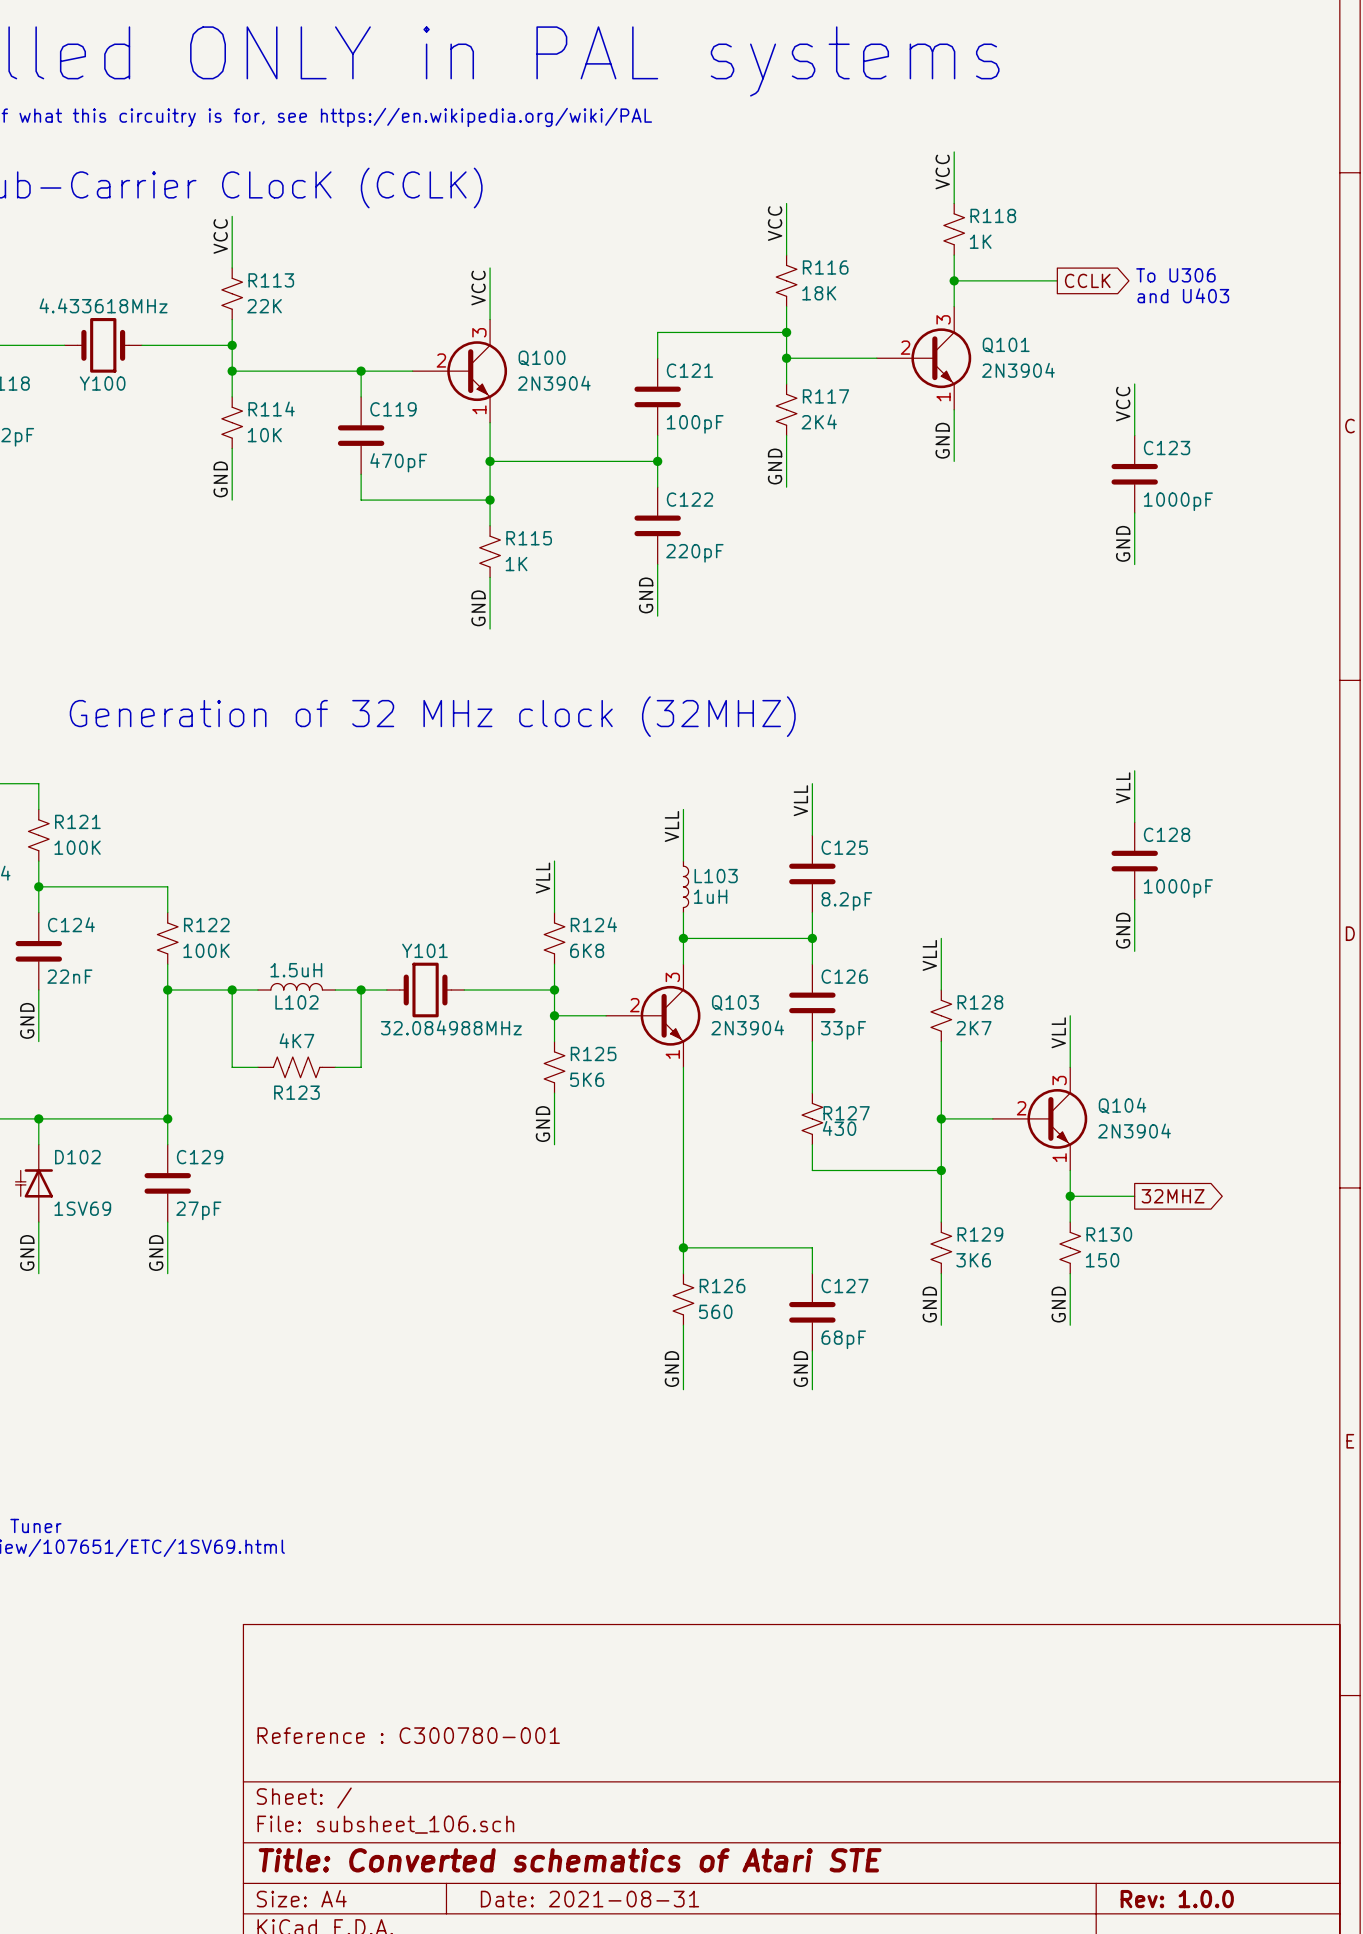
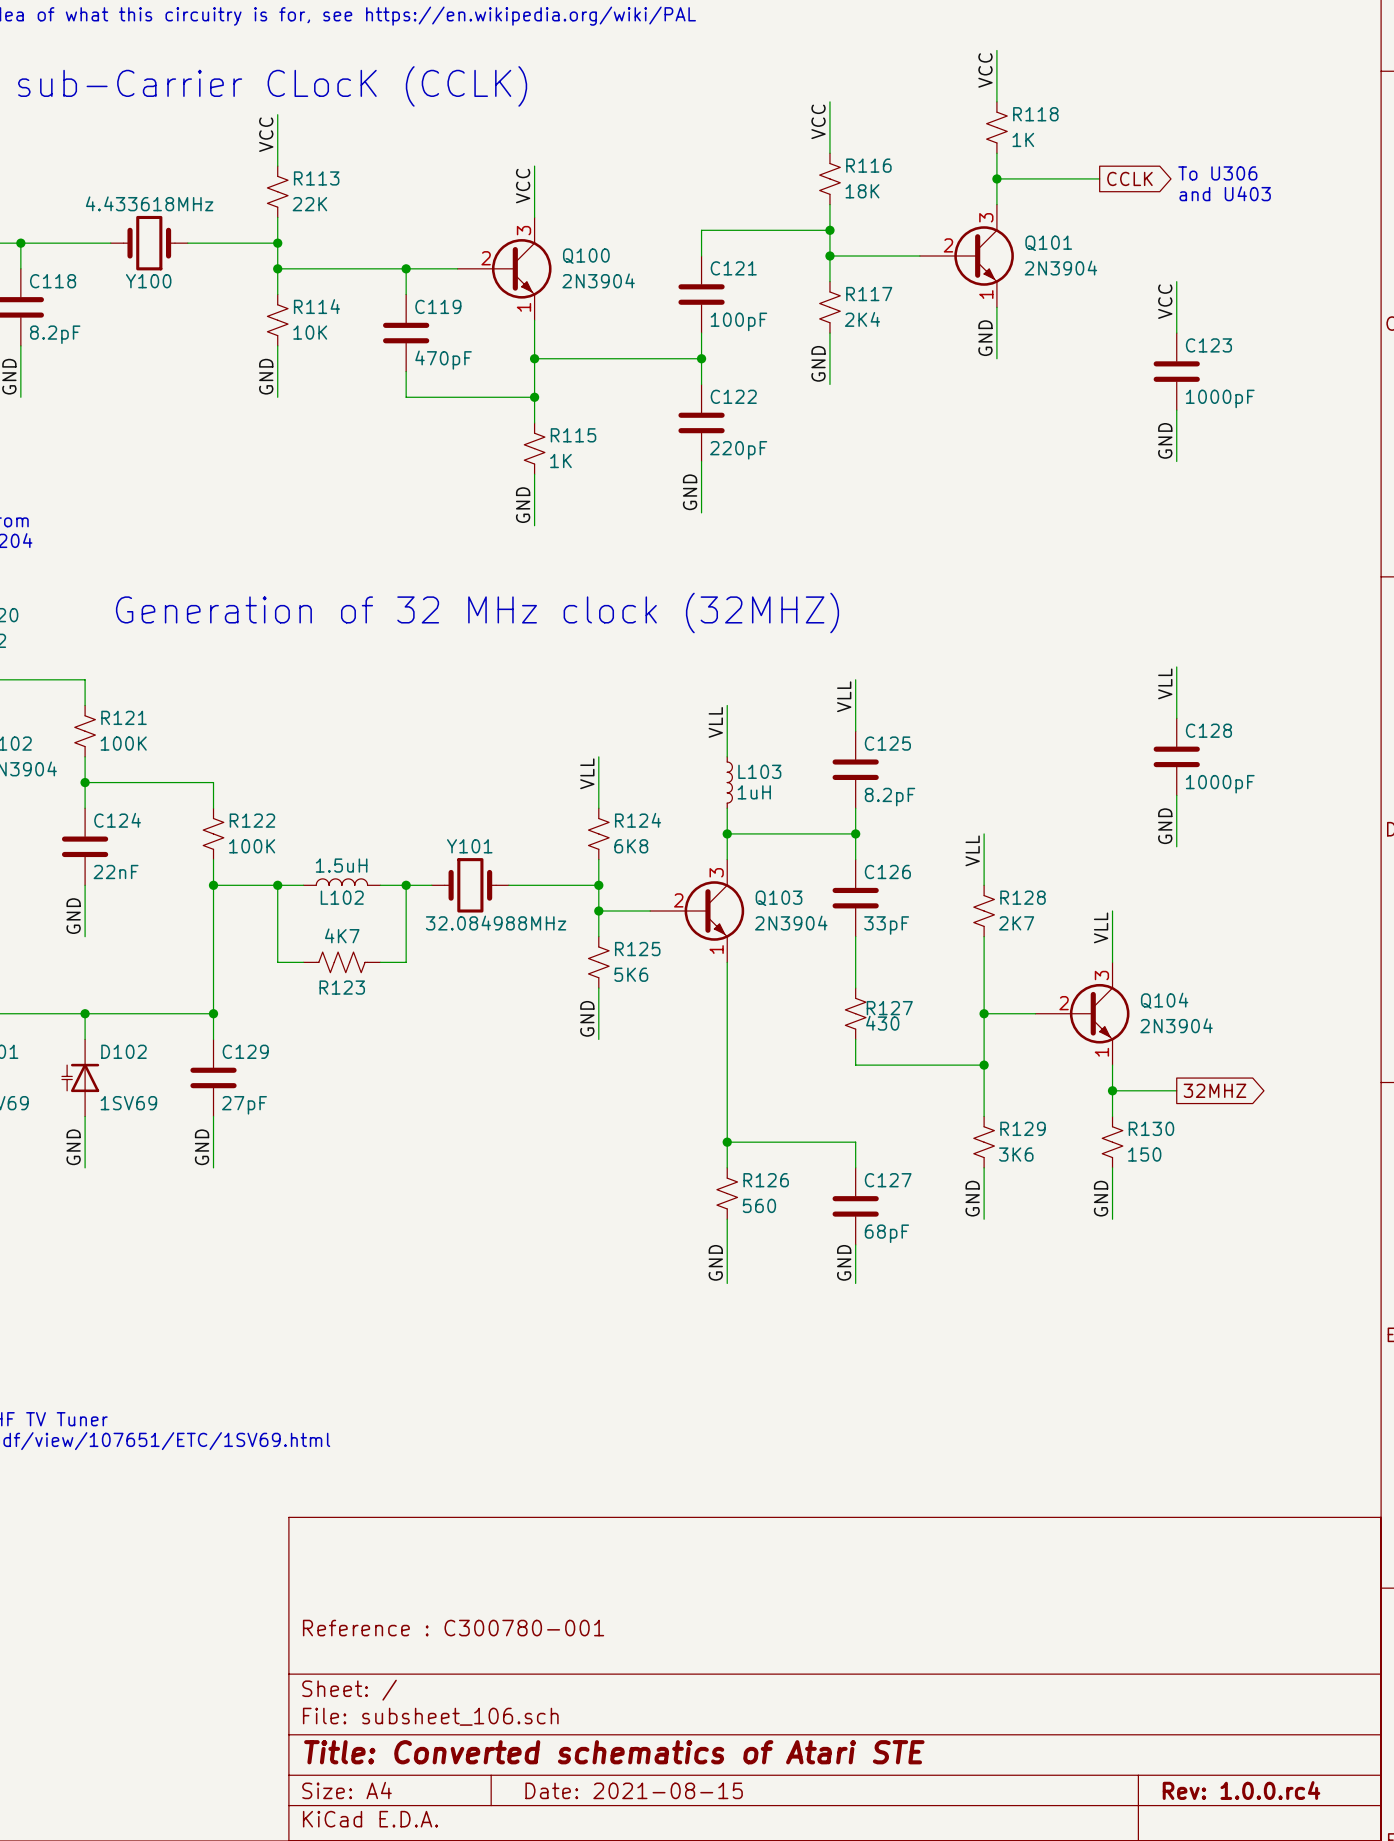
title block: Date: 2021-08-31 (589, 1899) -> Date: 2021-08-15 (634, 1790)
title block: Rev: 1.0.0 (1177, 1899) -> Rev: 1.0.0.rc4 (1241, 1790)

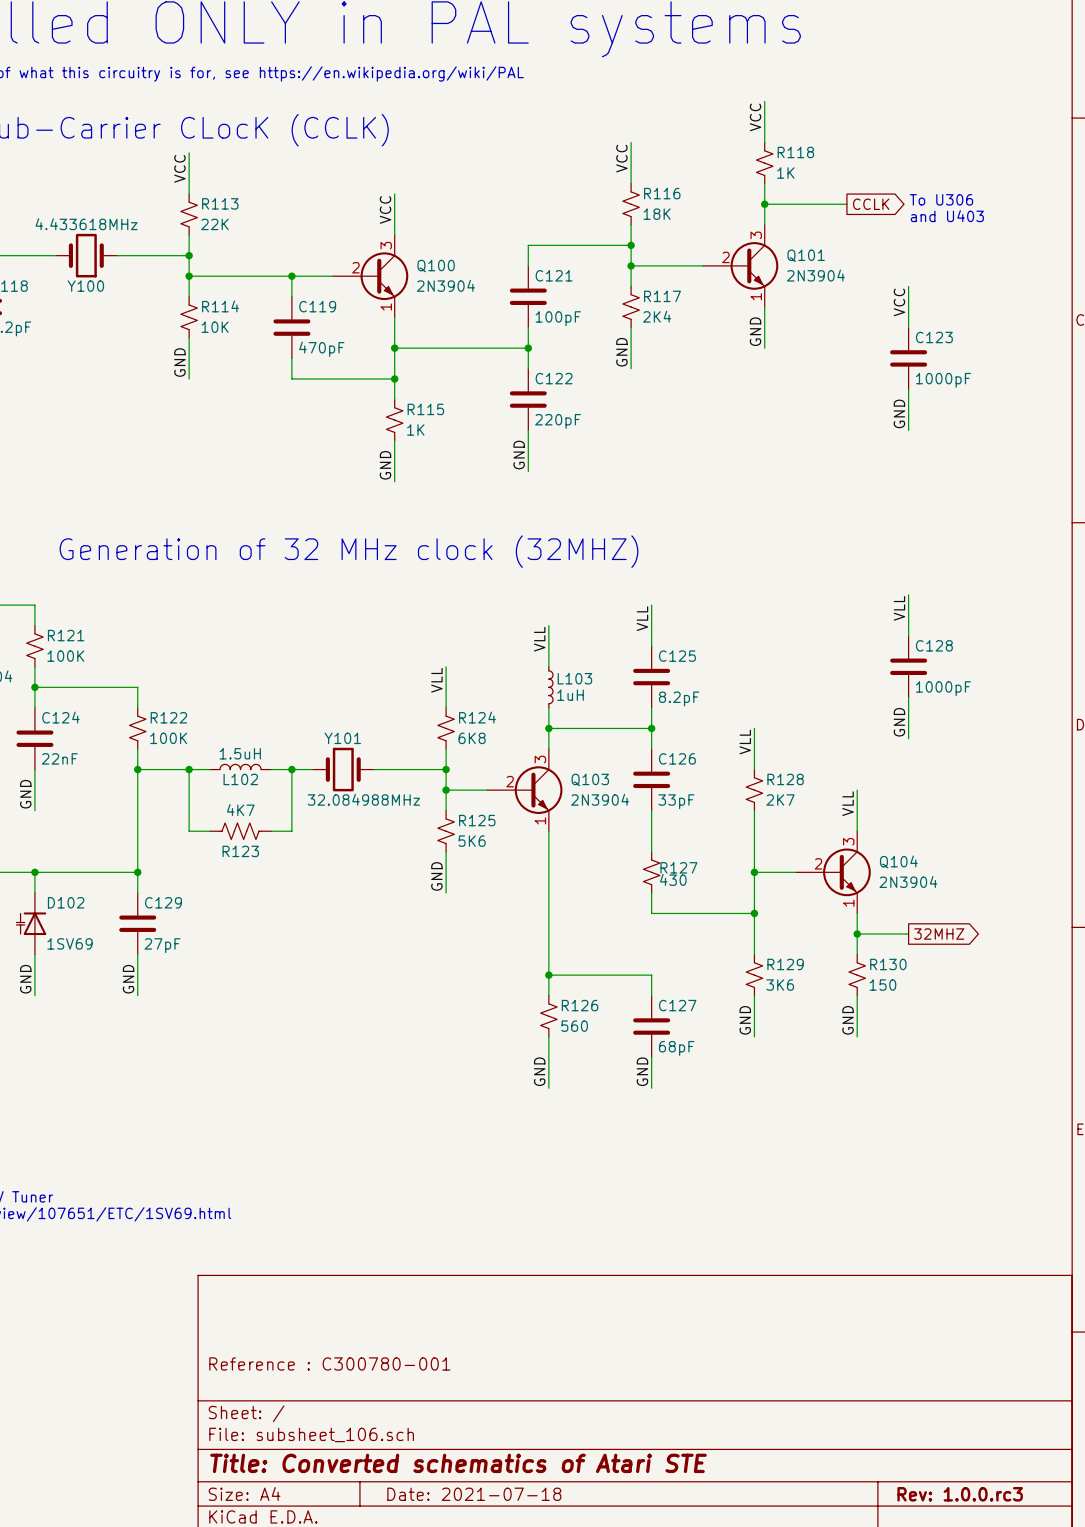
title block: Date: 2021-08-15 (634, 1790) -> Date: 2021-07-18 (474, 1494)
title block: Rev: 1.0.0.rc4 (1241, 1790) -> Rev: 1.0.0.rc3 (960, 1494)

